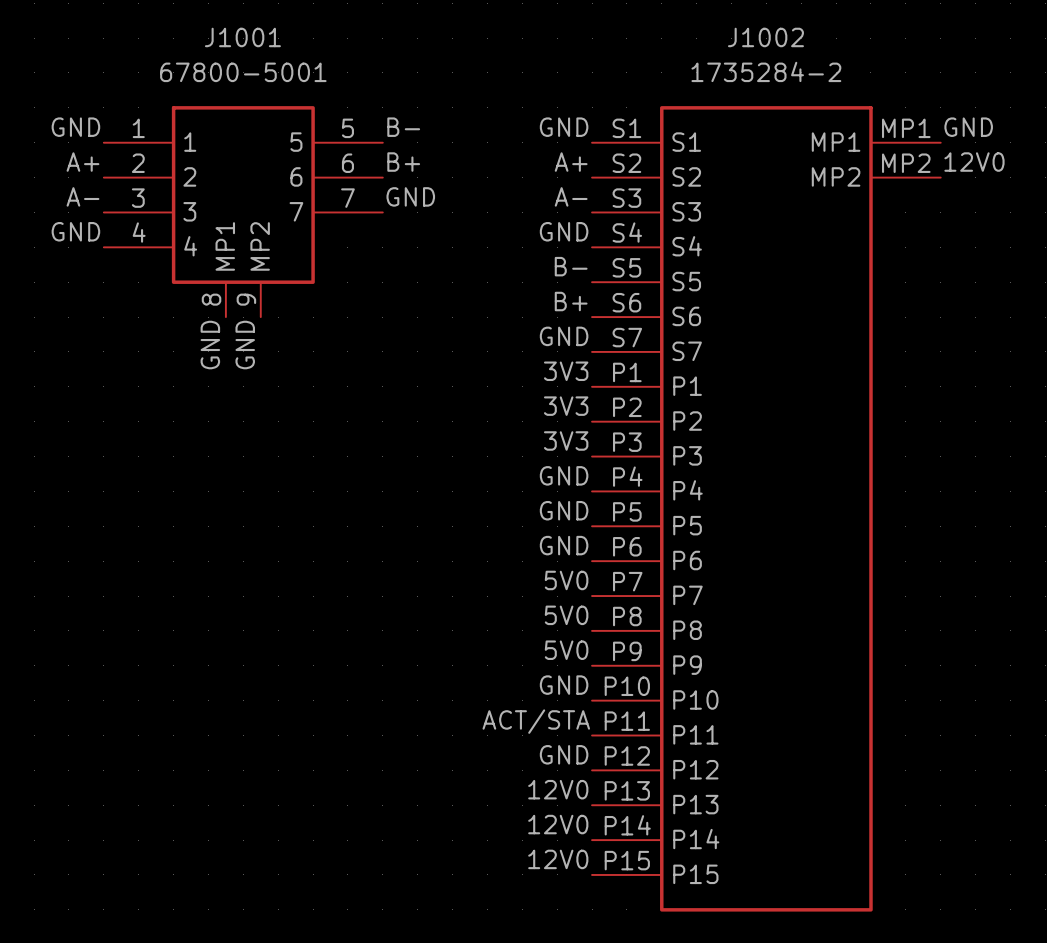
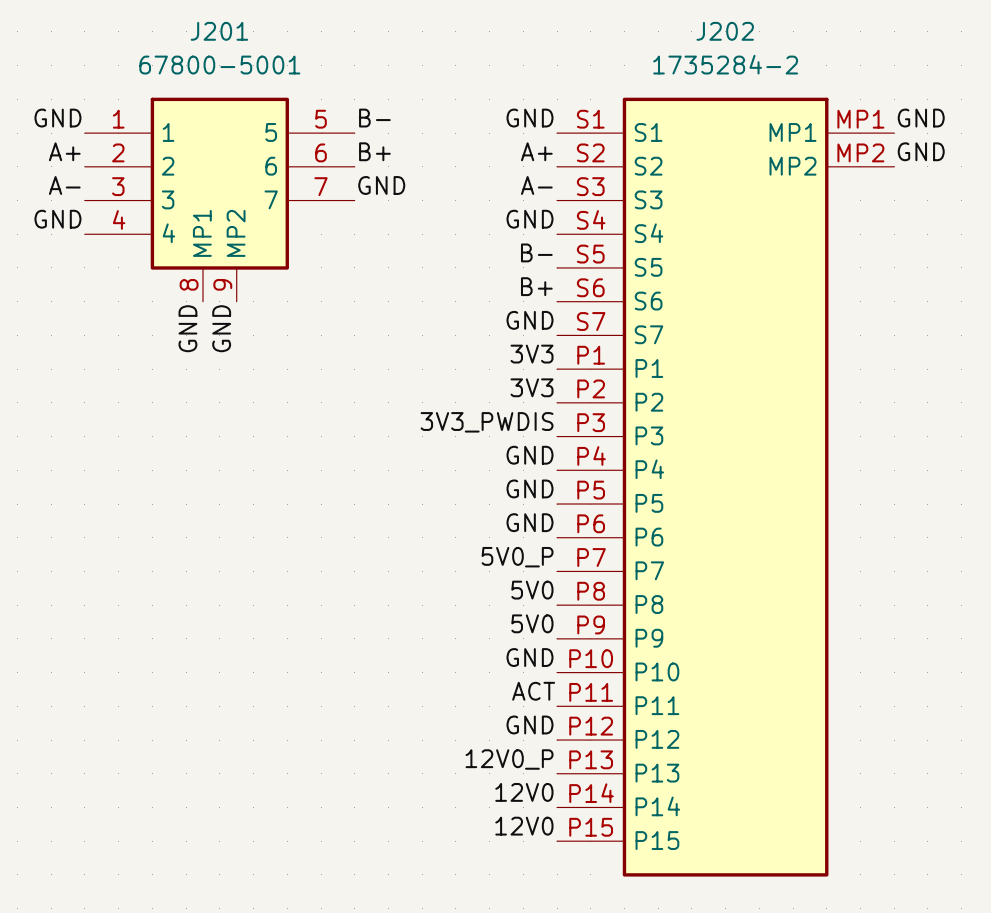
J1001 name: J1001 (242, 37) -> J201 (219, 31)
J1002 name: J1002 (765, 37) -> J202 (725, 31)
label: 12V0 (974, 162) -> GND (921, 151)
label: 3V3 (566, 440) -> 3V3_PWDIS (487, 422)
label: 5V0 (566, 580) -> 5V0_P (517, 557)
label: ACT/STA (536, 721) -> ACT (533, 691)
label: 12V0 (558, 789) -> 12V0_P (509, 759)

